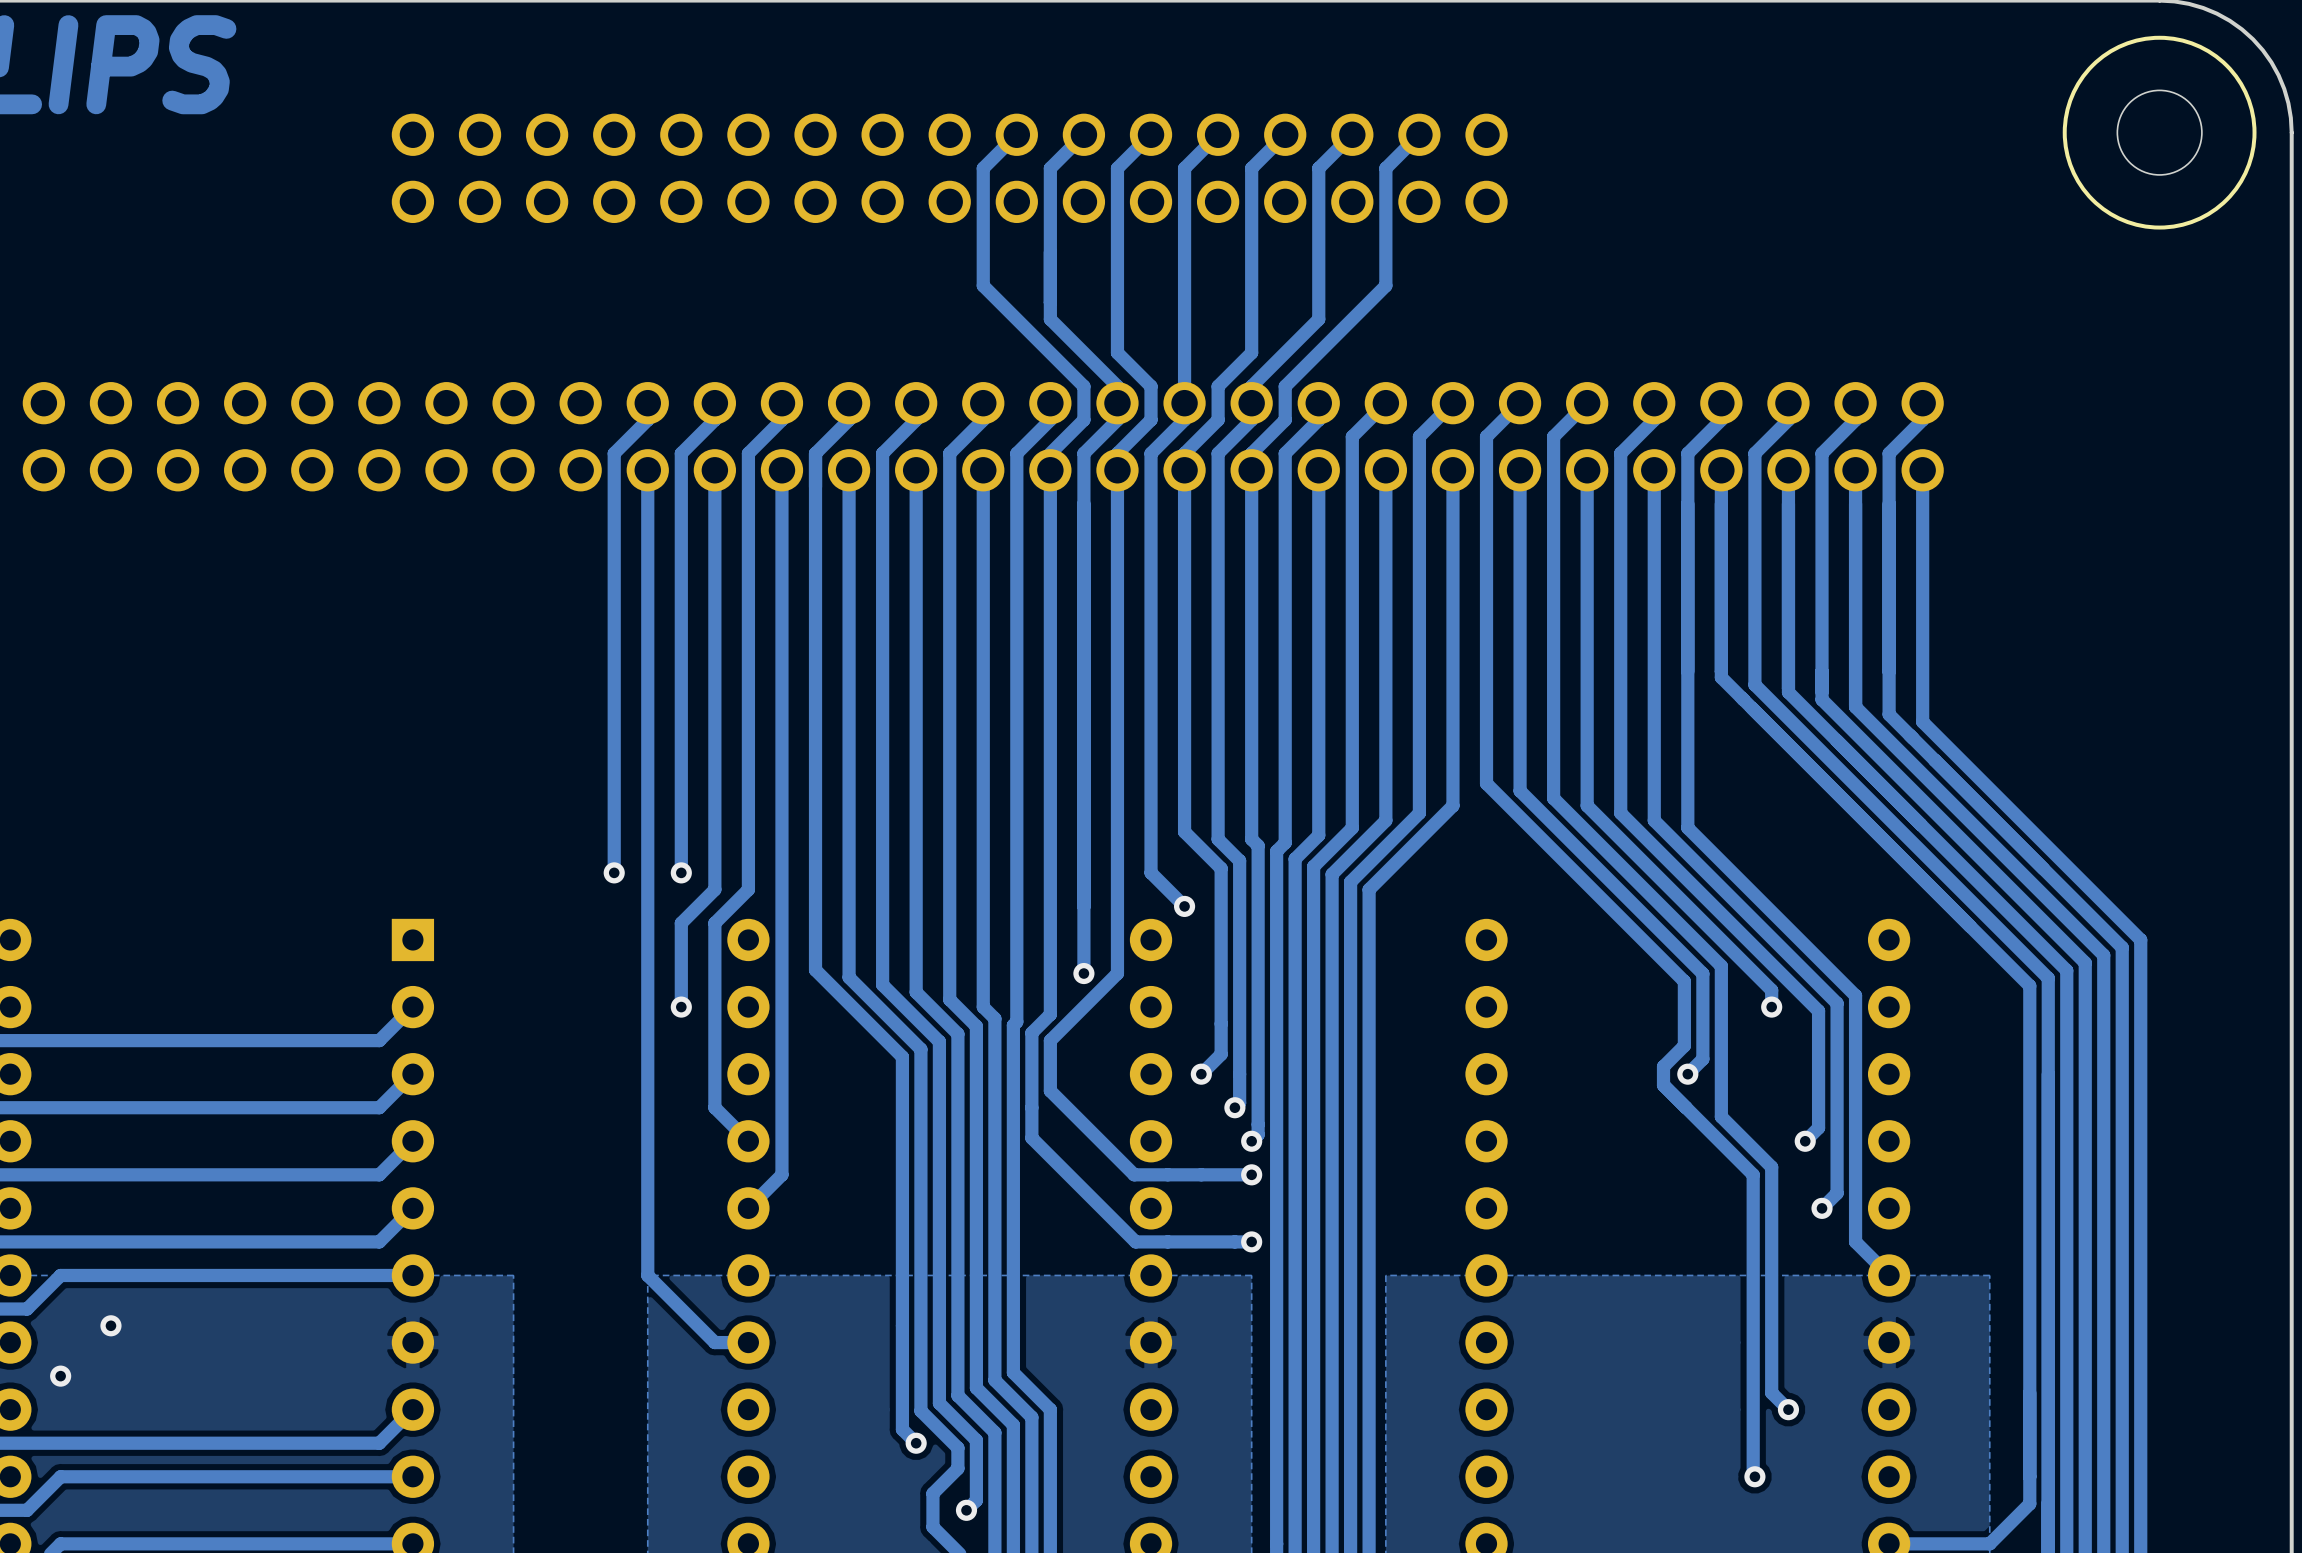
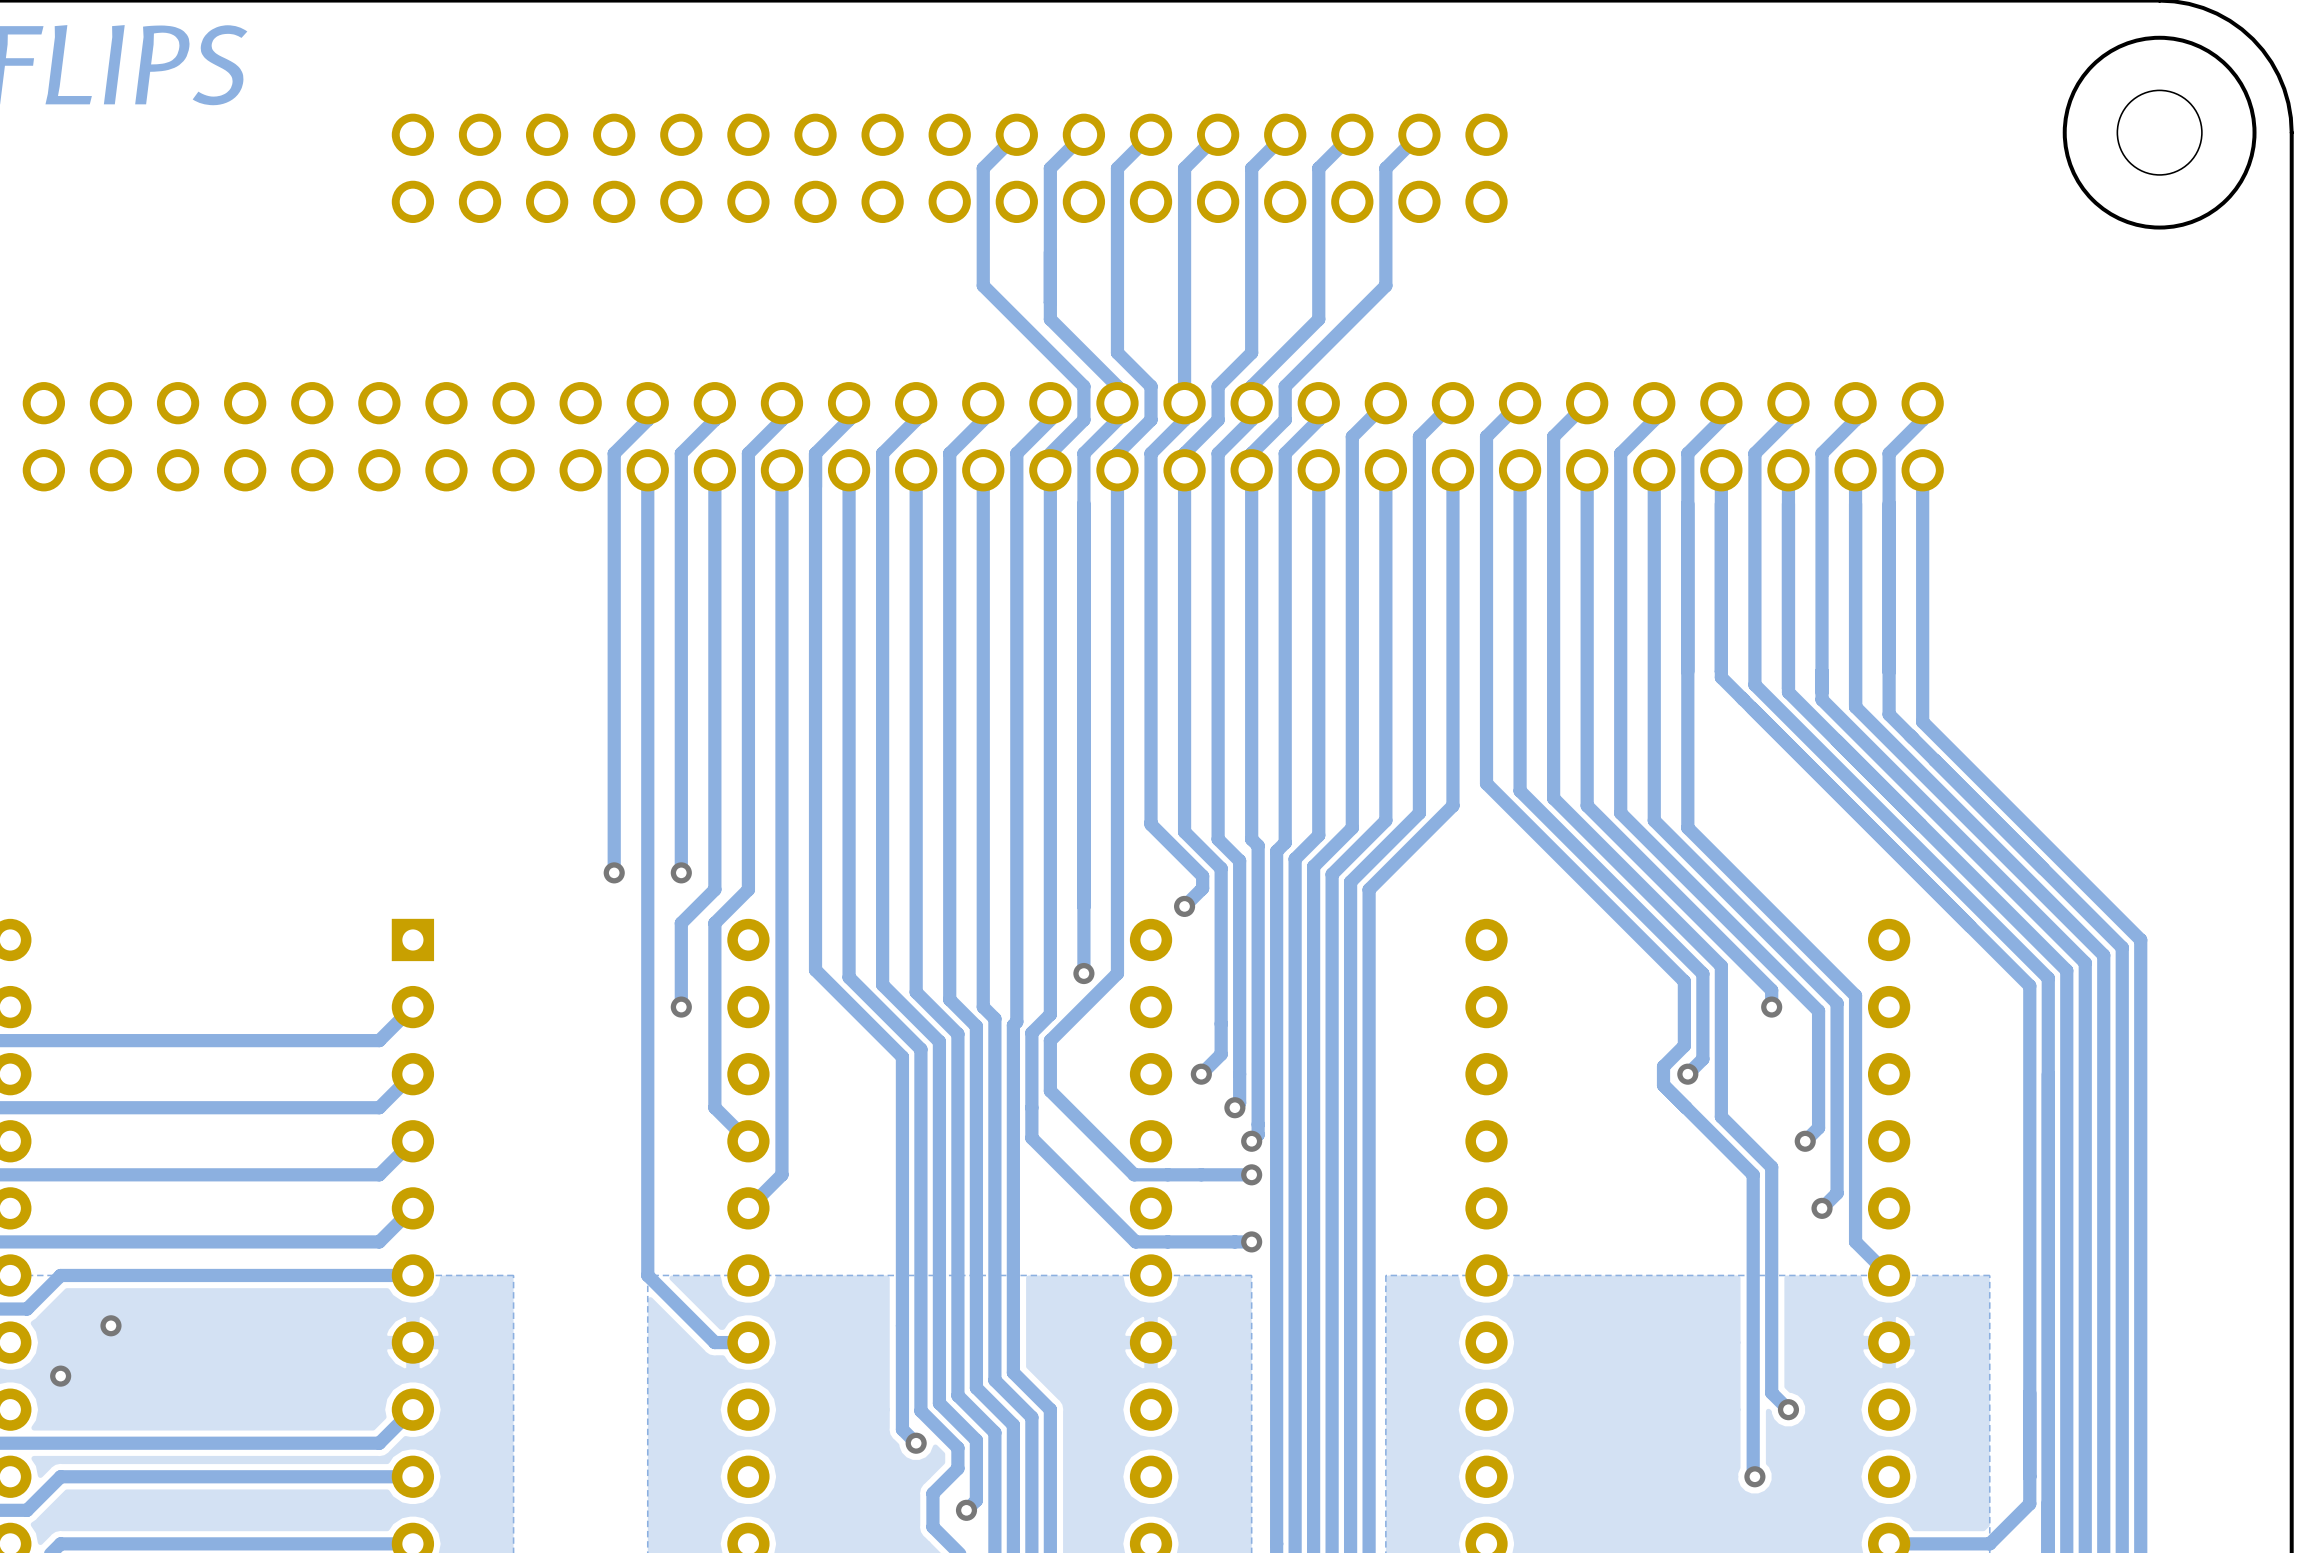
track: (1151, 824) (1151, 872) (1184, 906) -> (1151, 824) (1202, 876) (1202, 888) (1185, 906)

